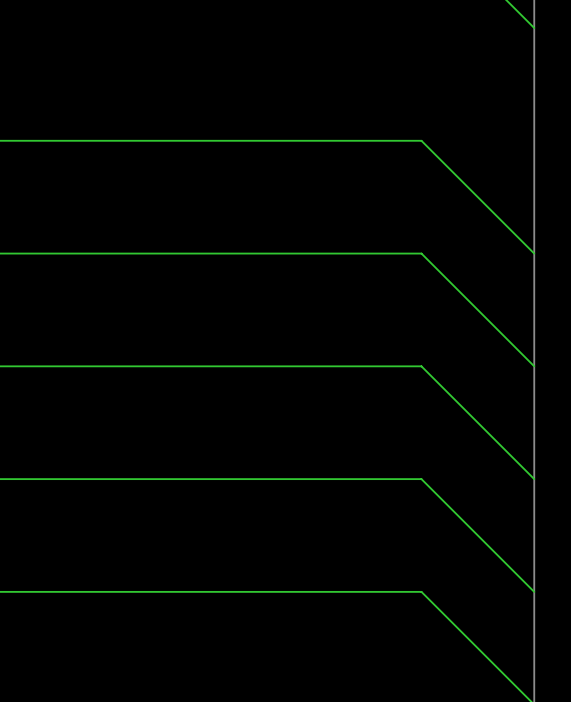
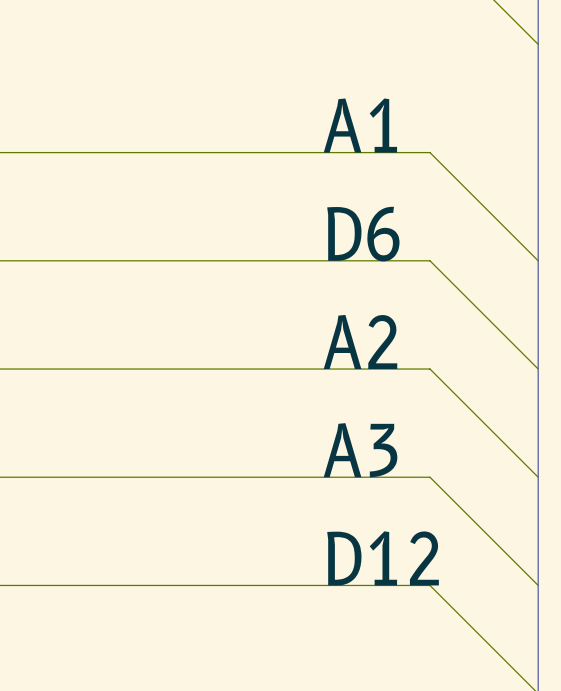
label: none -> A1 (360, 125)
label: none -> D6 (363, 234)
label: none -> A2 (360, 341)
label: none -> A3 (360, 450)
label: none -> D12 (383, 558)

